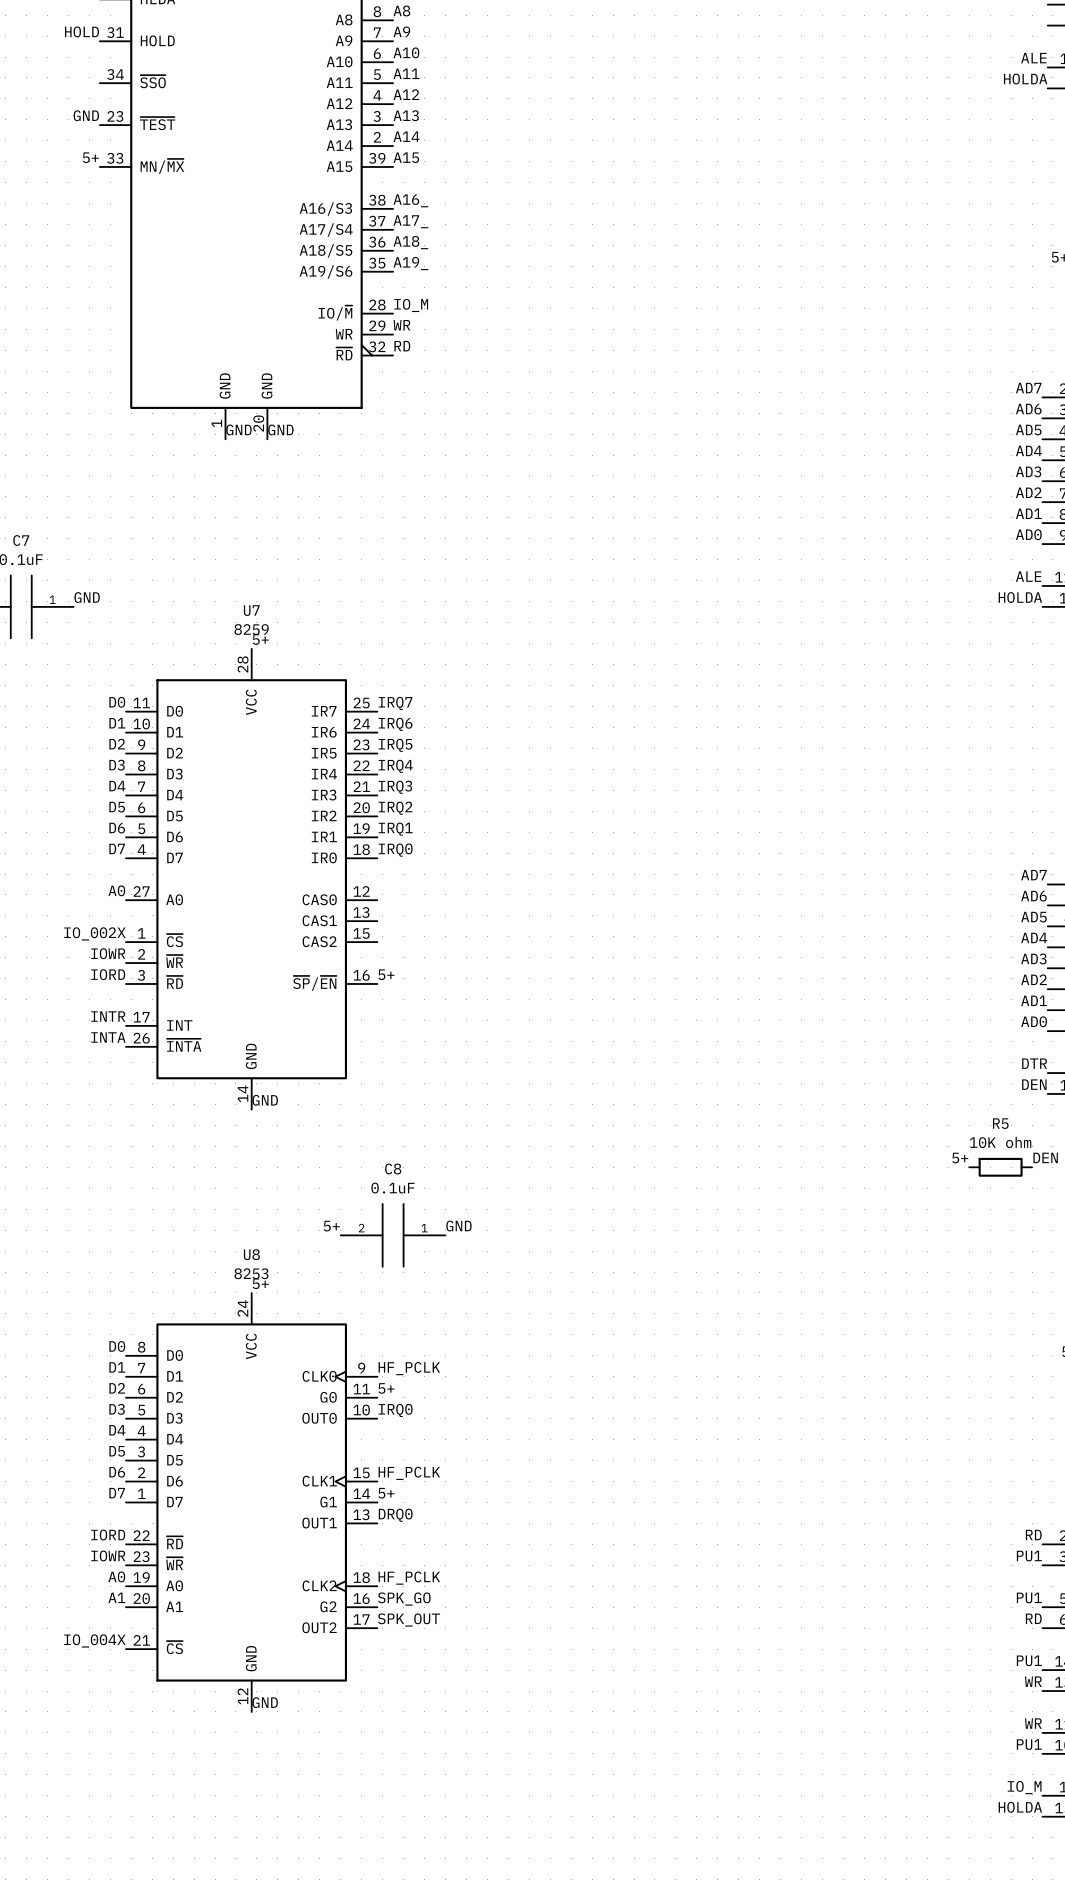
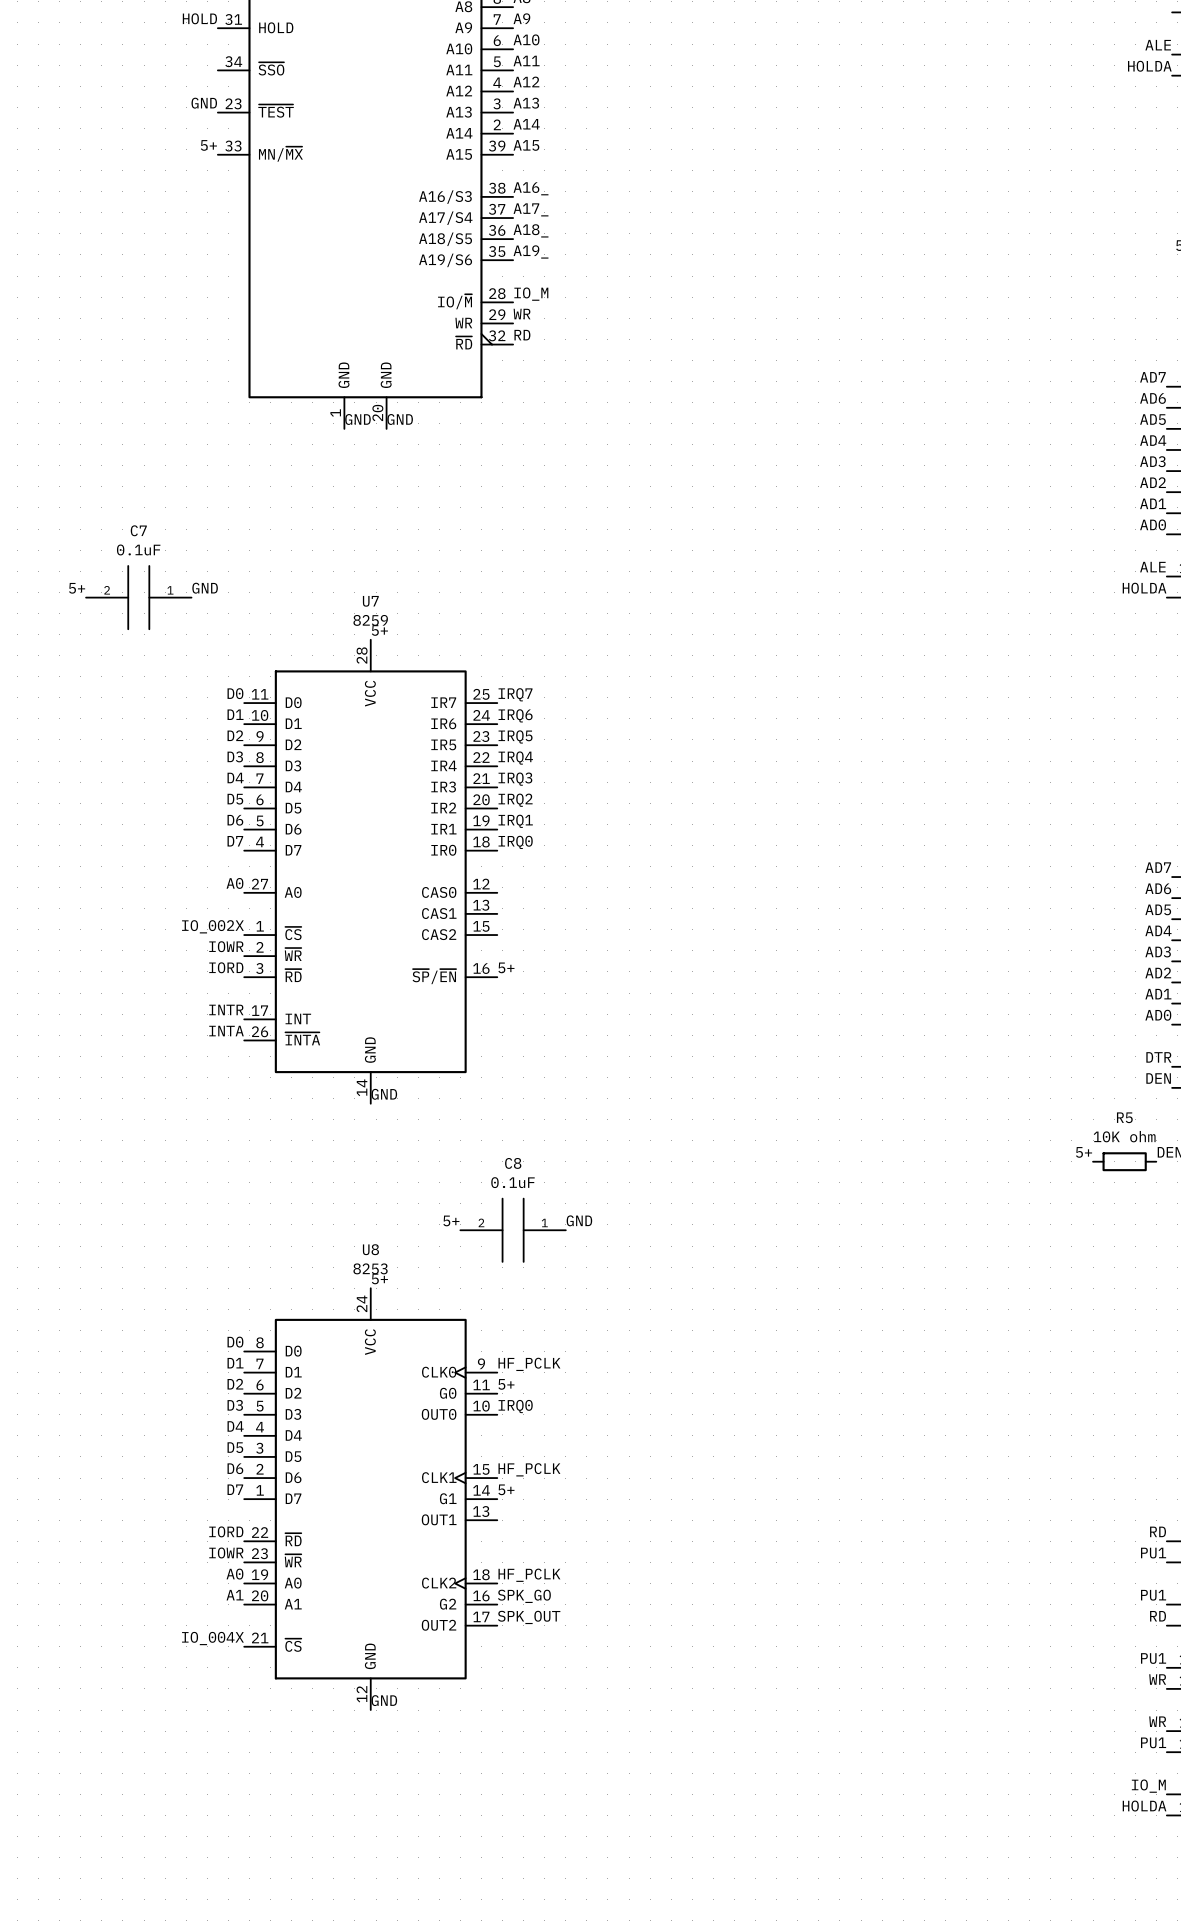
label: DRQ0 (395, 1515) -> none

